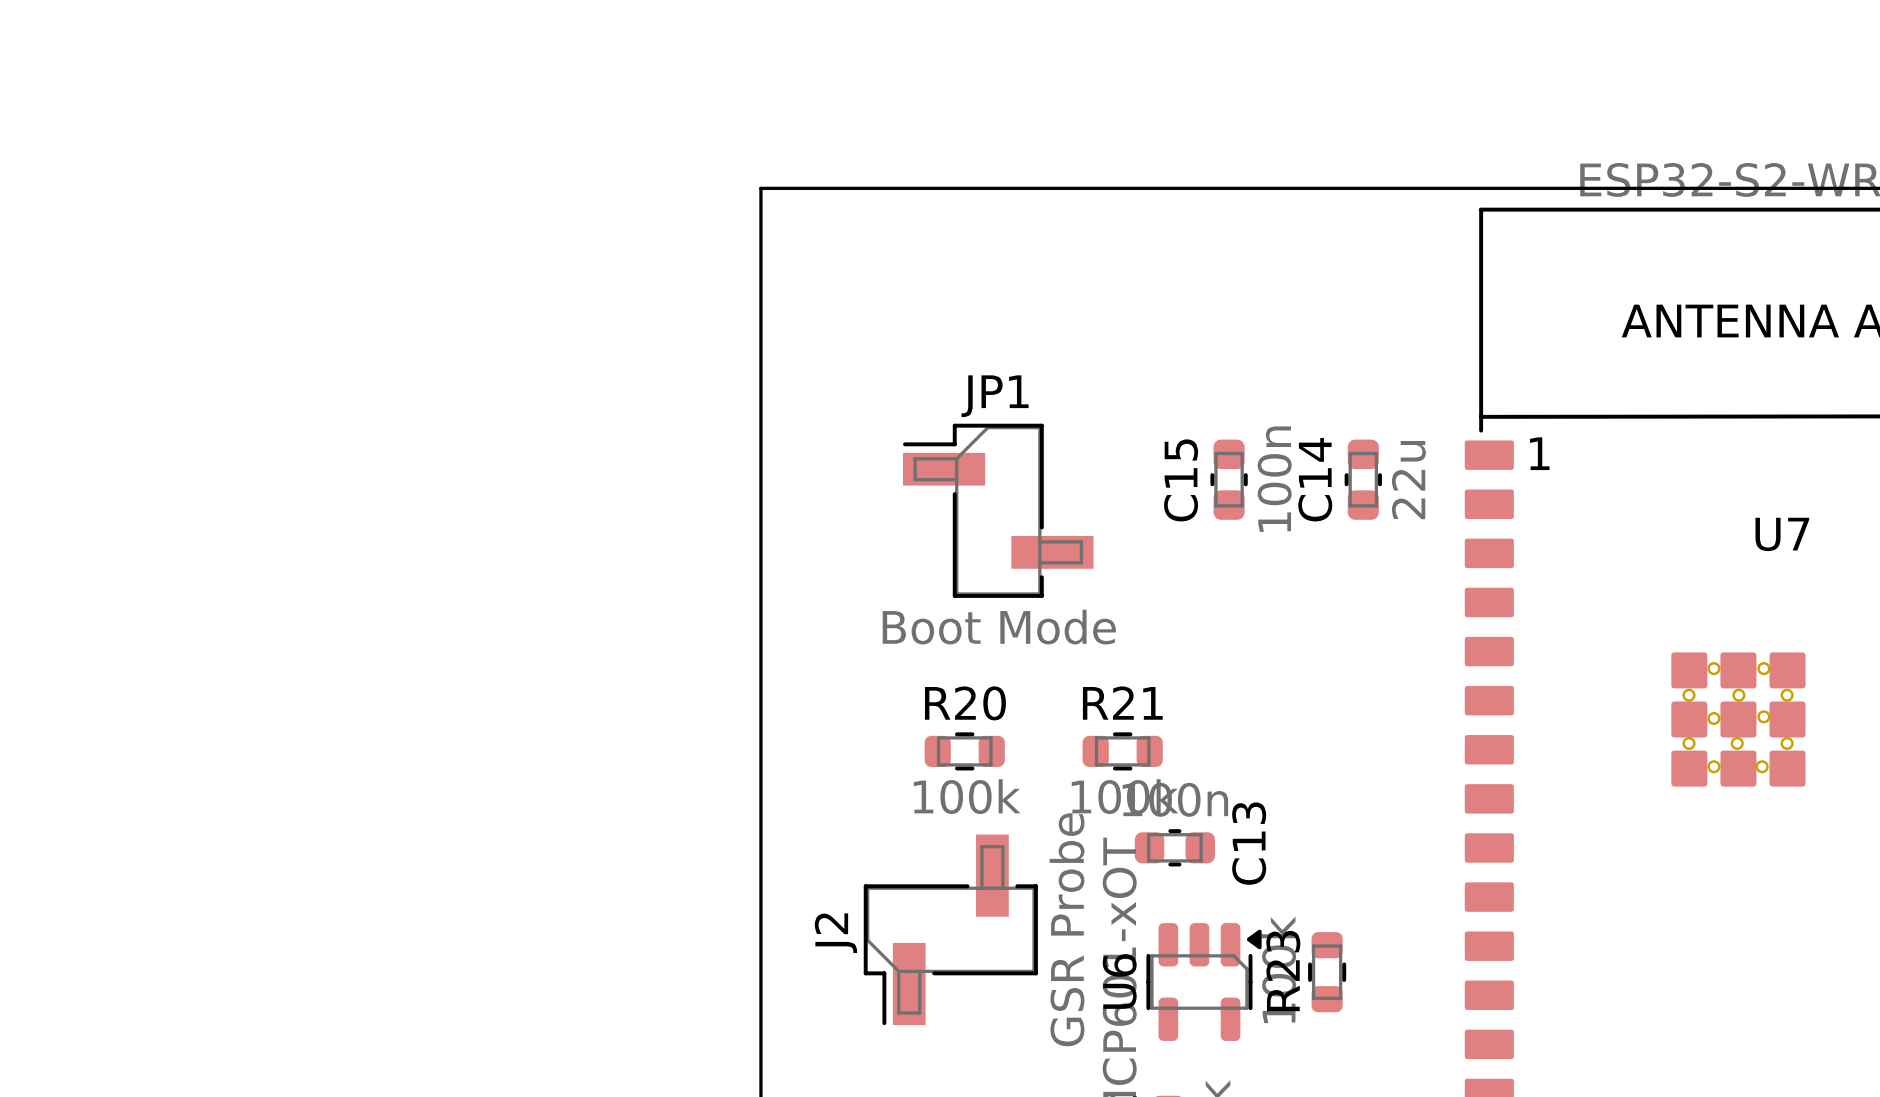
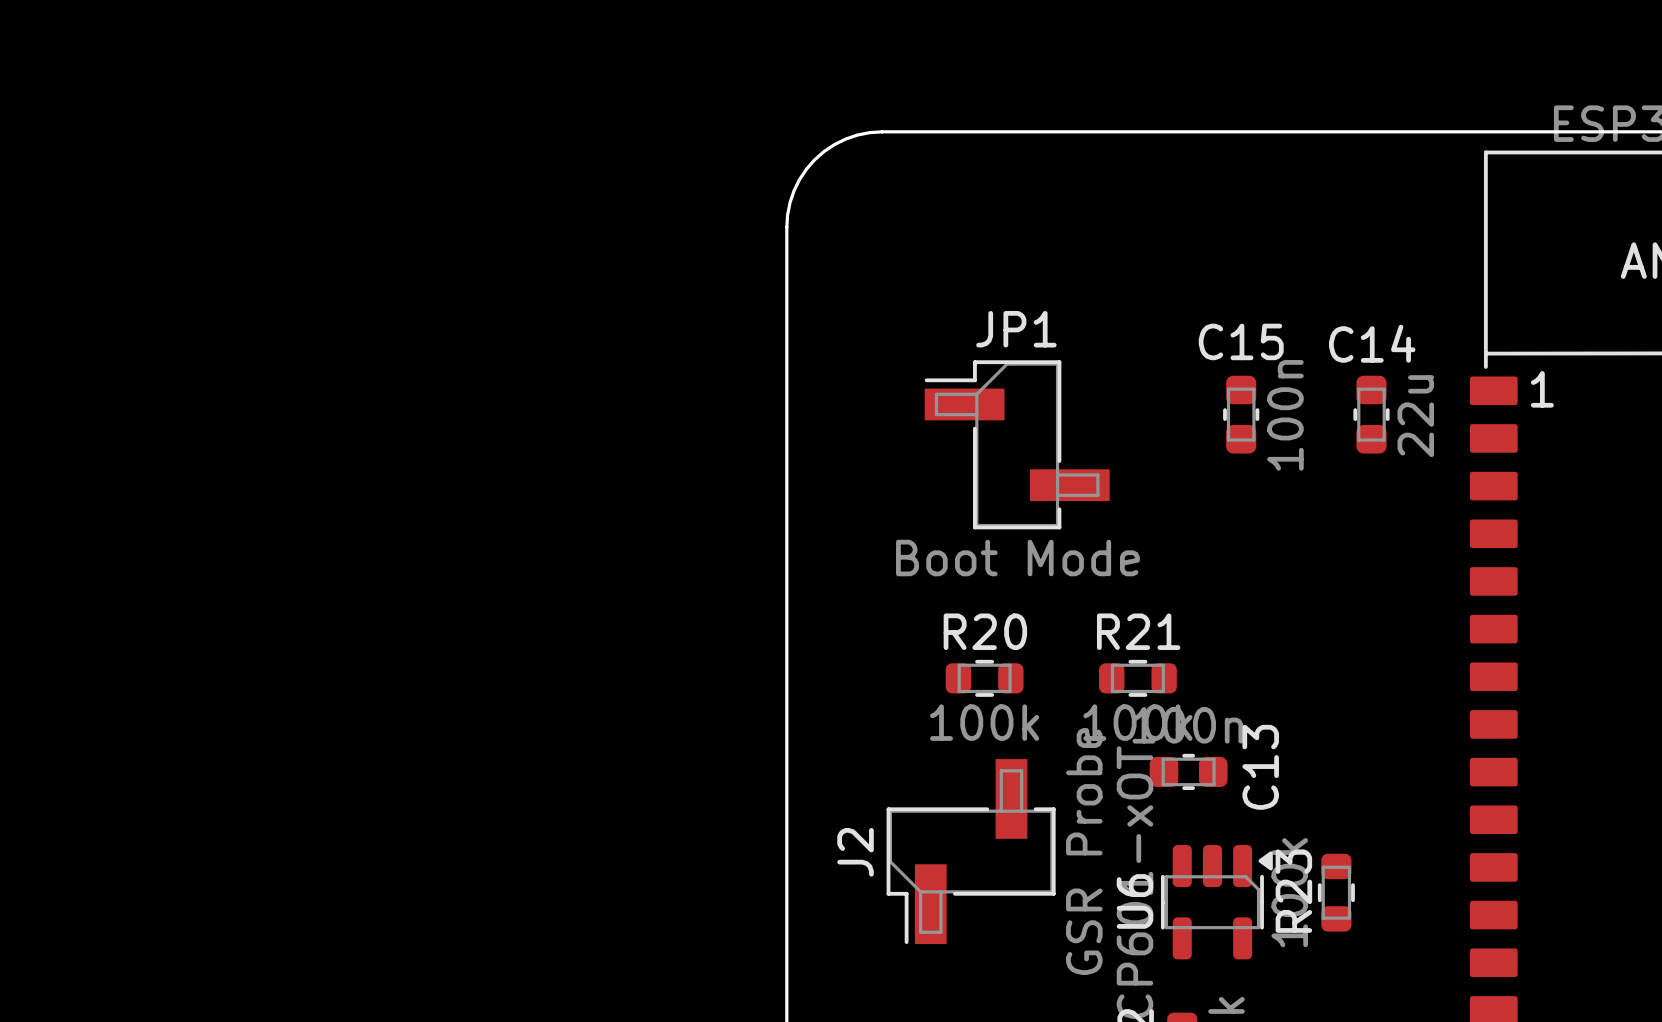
board edge: (859, 188) (760, 188) (760, 286) -> (882, 131) (857, 135) (845, 139) (824, 151) (814, 159) (799, 179) (794, 190) (790, 202) (786, 227)
C14 name rotation: 0° (1315, 479) -> 90° clockwise (1372, 343)
C15 name rotation: 0° (1181, 480) -> 90° clockwise (1241, 341)

